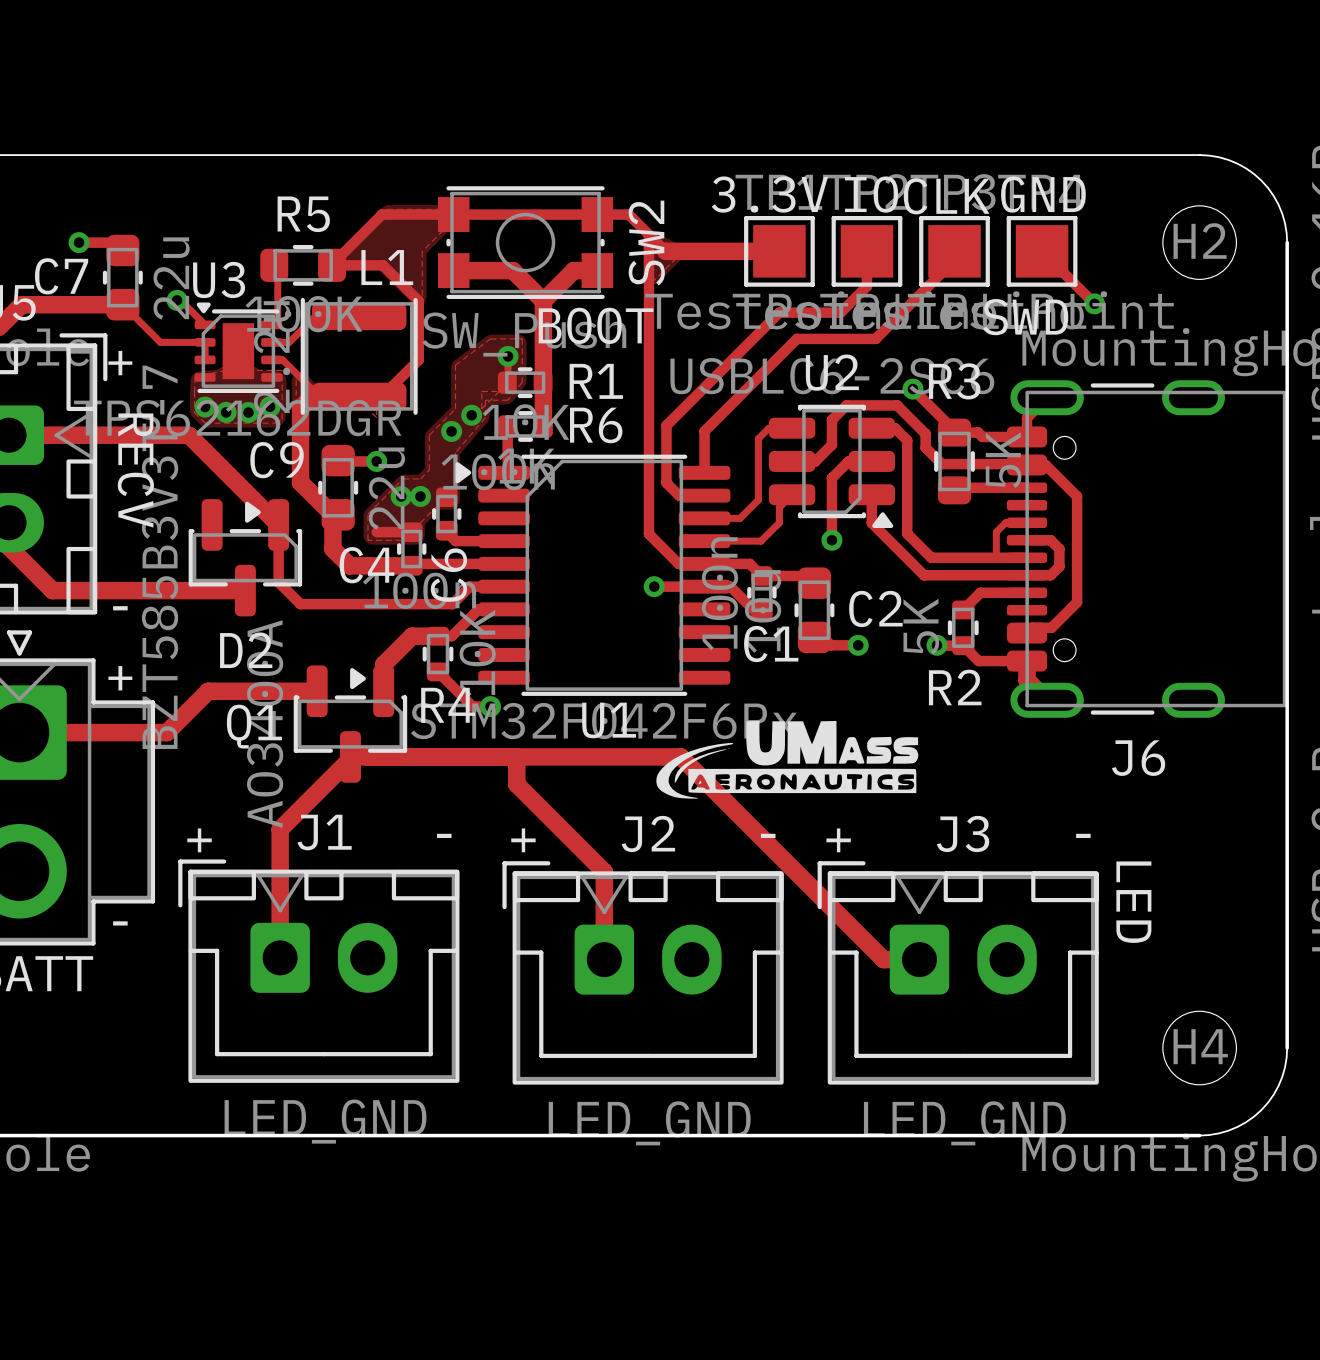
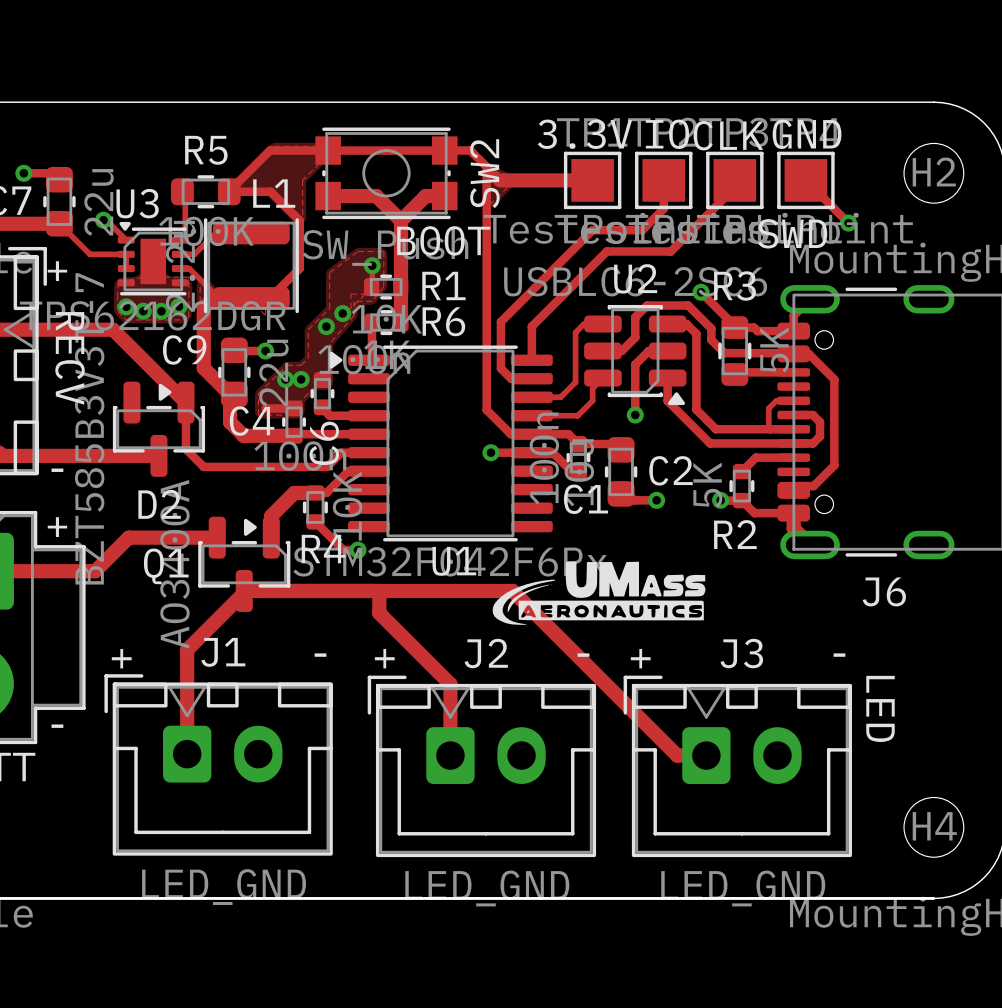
C4 name position: C4 (367, 565) -> C4 (252, 421)

